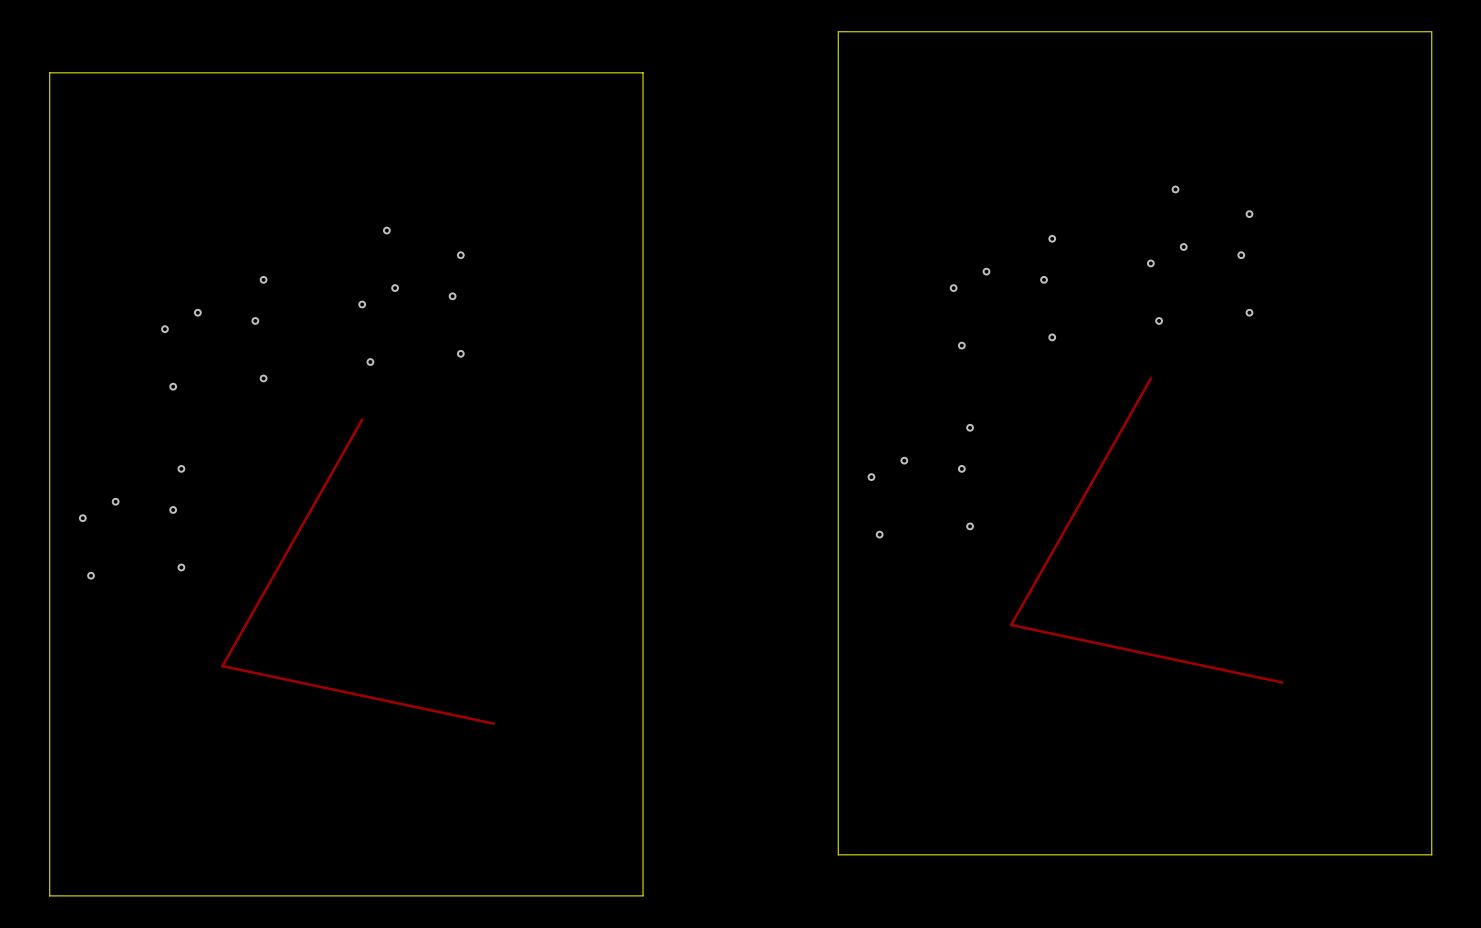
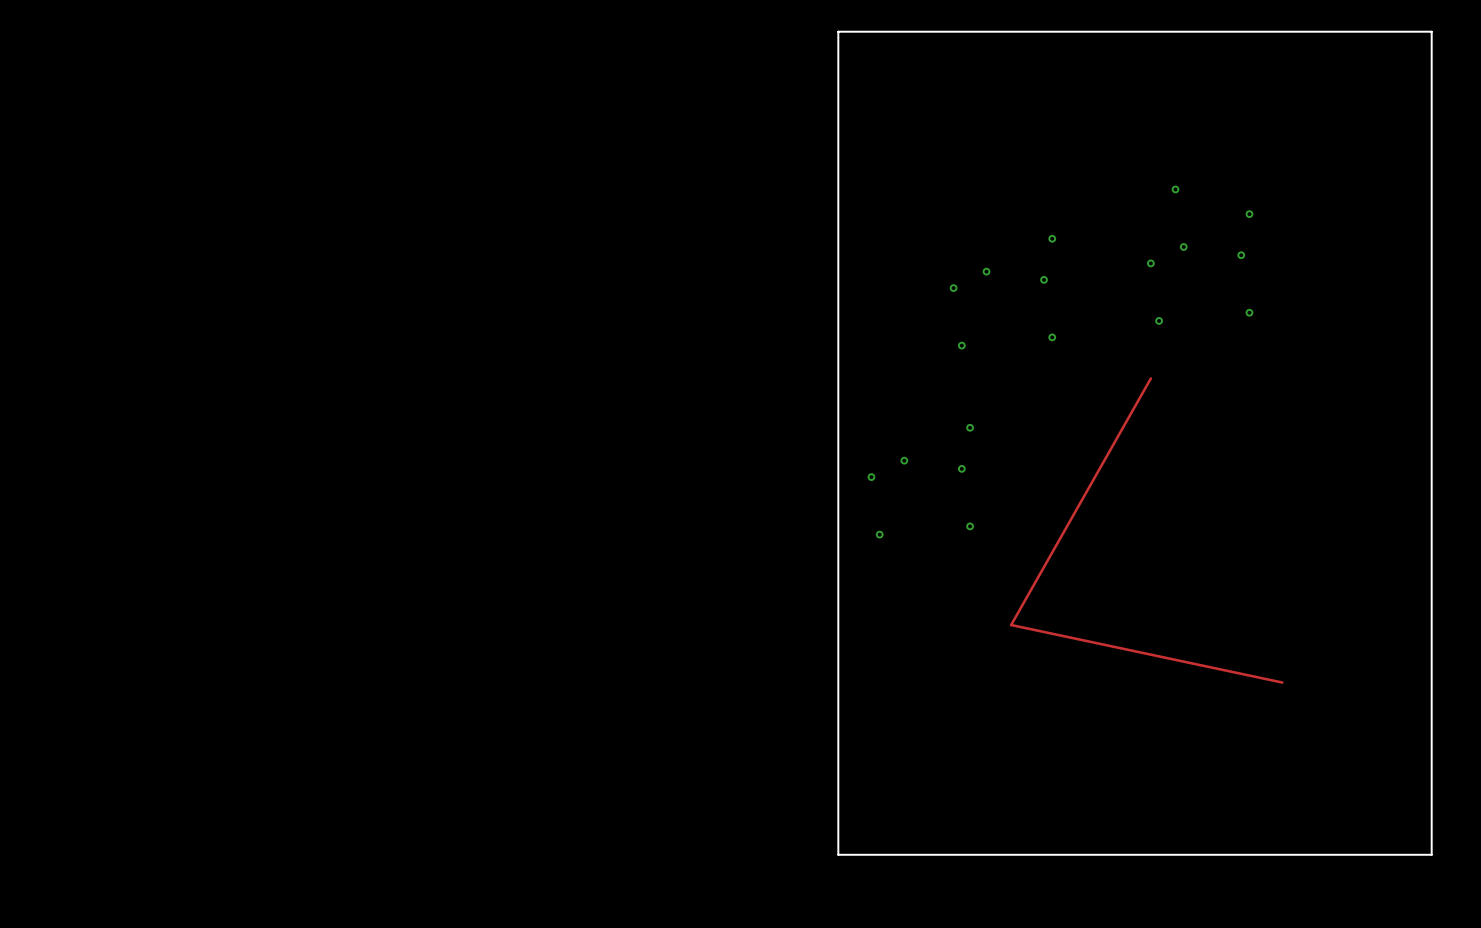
board edge: (49, 72) (643, 72) (643, 895) (49, 895) (49, 72) -> none
via: (386, 230) -> none
via: (460, 255) -> none
via: (263, 279) -> none
via: (395, 288) -> none
via: (452, 296) -> none
via: (362, 304) -> none
via: (197, 312) -> none
via: (255, 320) -> none
via: (164, 329) -> none
via: (460, 353) -> none
via: (370, 362) -> none
via: (263, 378) -> none
via: (173, 386) -> none
top track: (362, 419) (222, 666) (493, 723) -> none
via: (181, 468) -> none
via: (115, 501) -> none
via: (173, 509) -> none
via: (82, 518) -> none
via: (181, 567) -> none
via: (91, 575) -> none

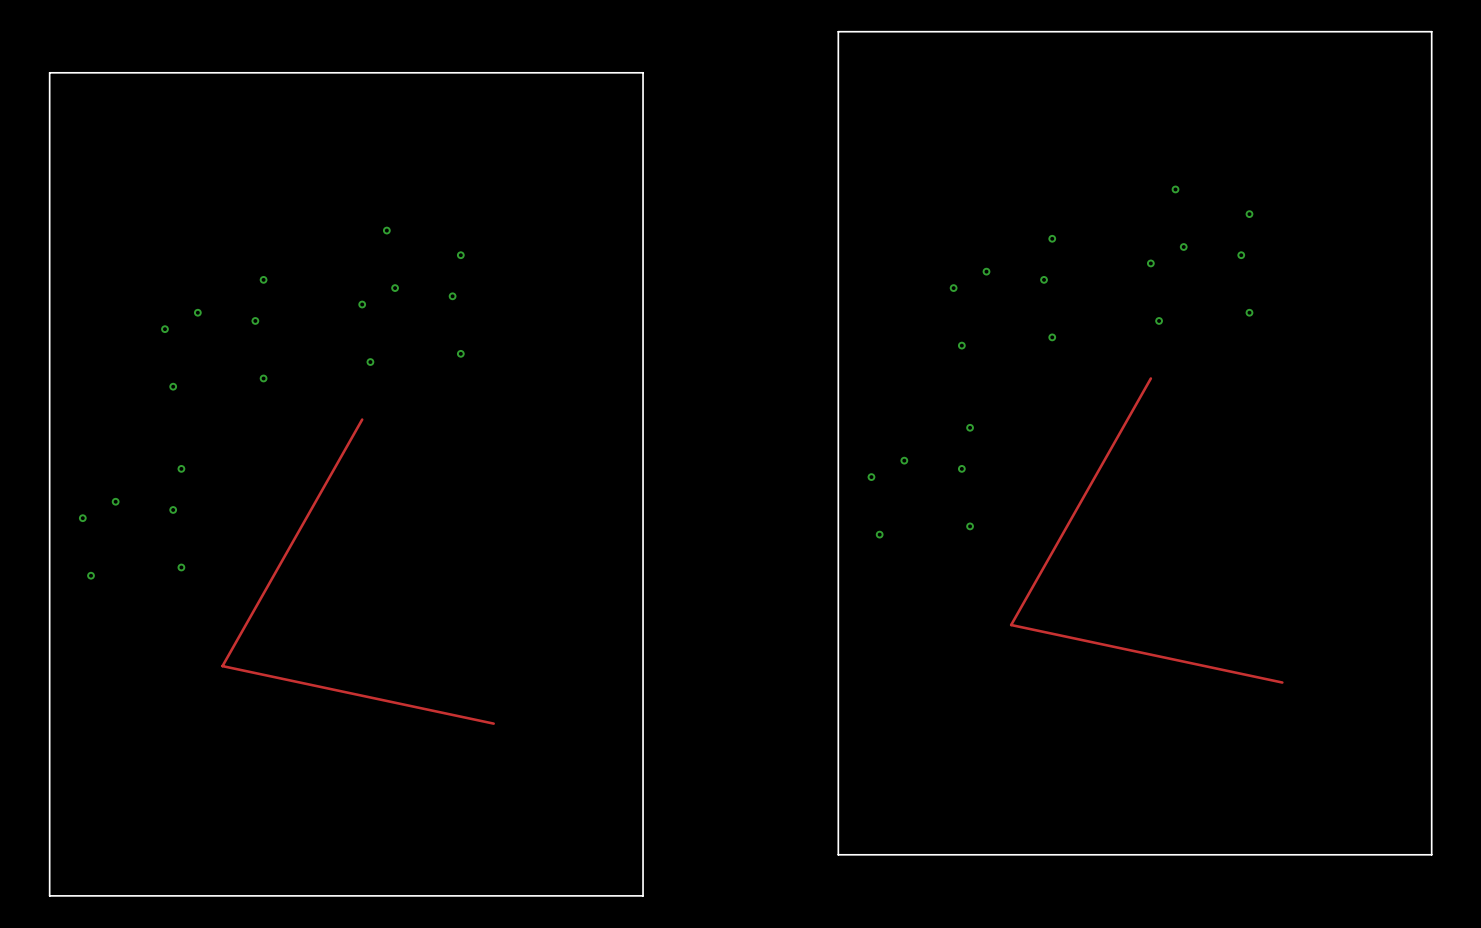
board edge: none -> (49, 72) (643, 72) (643, 895) (49, 895) (49, 72)
via: none -> (386, 230)
via: none -> (460, 255)
via: none -> (263, 279)
via: none -> (395, 288)
via: none -> (452, 296)
via: none -> (362, 304)
via: none -> (197, 312)
via: none -> (255, 320)
via: none -> (164, 329)
via: none -> (460, 353)
via: none -> (370, 362)
via: none -> (263, 378)
via: none -> (173, 386)
top track: none -> (362, 419) (222, 666) (493, 723)
via: none -> (181, 468)
via: none -> (115, 501)
via: none -> (173, 509)
via: none -> (82, 518)
via: none -> (181, 567)
via: none -> (91, 575)

